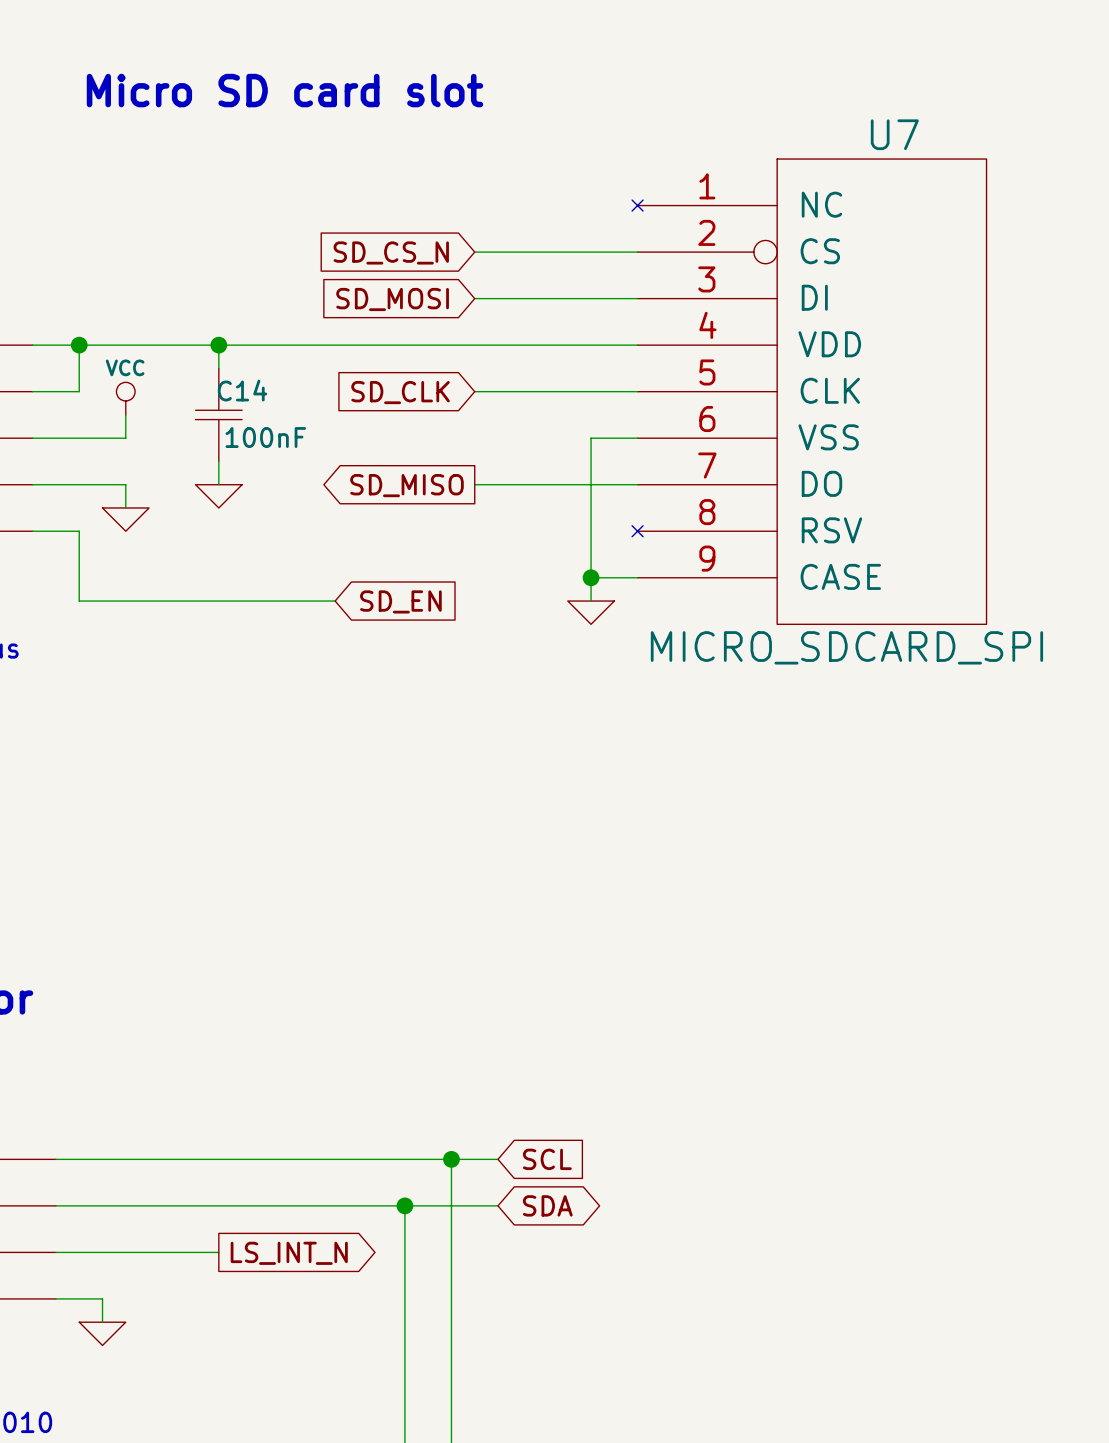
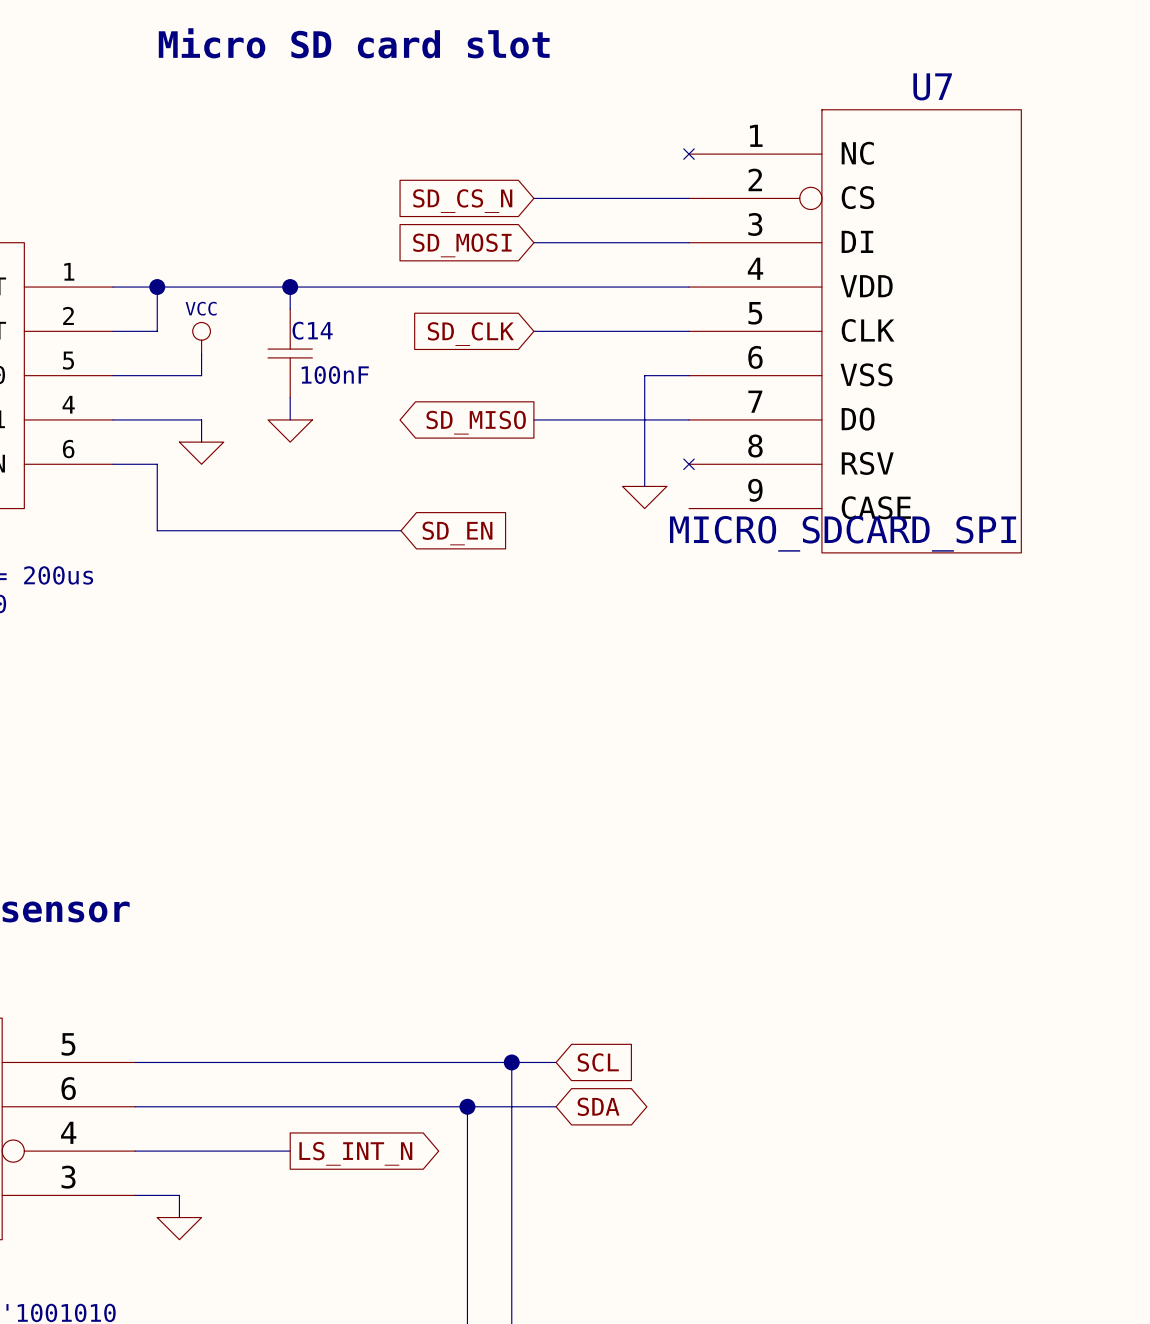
wire: (591, 554) (591, 601) -> none
wire: (591, 577) (637, 577) -> none
junction: (591, 577) -> none
power symbol position: (591, 612) -> (644, 497)
U7 value position: MICRO_SDCARD_SPI (846, 647) -> MICRO_SDCARD_SPI (843, 533)

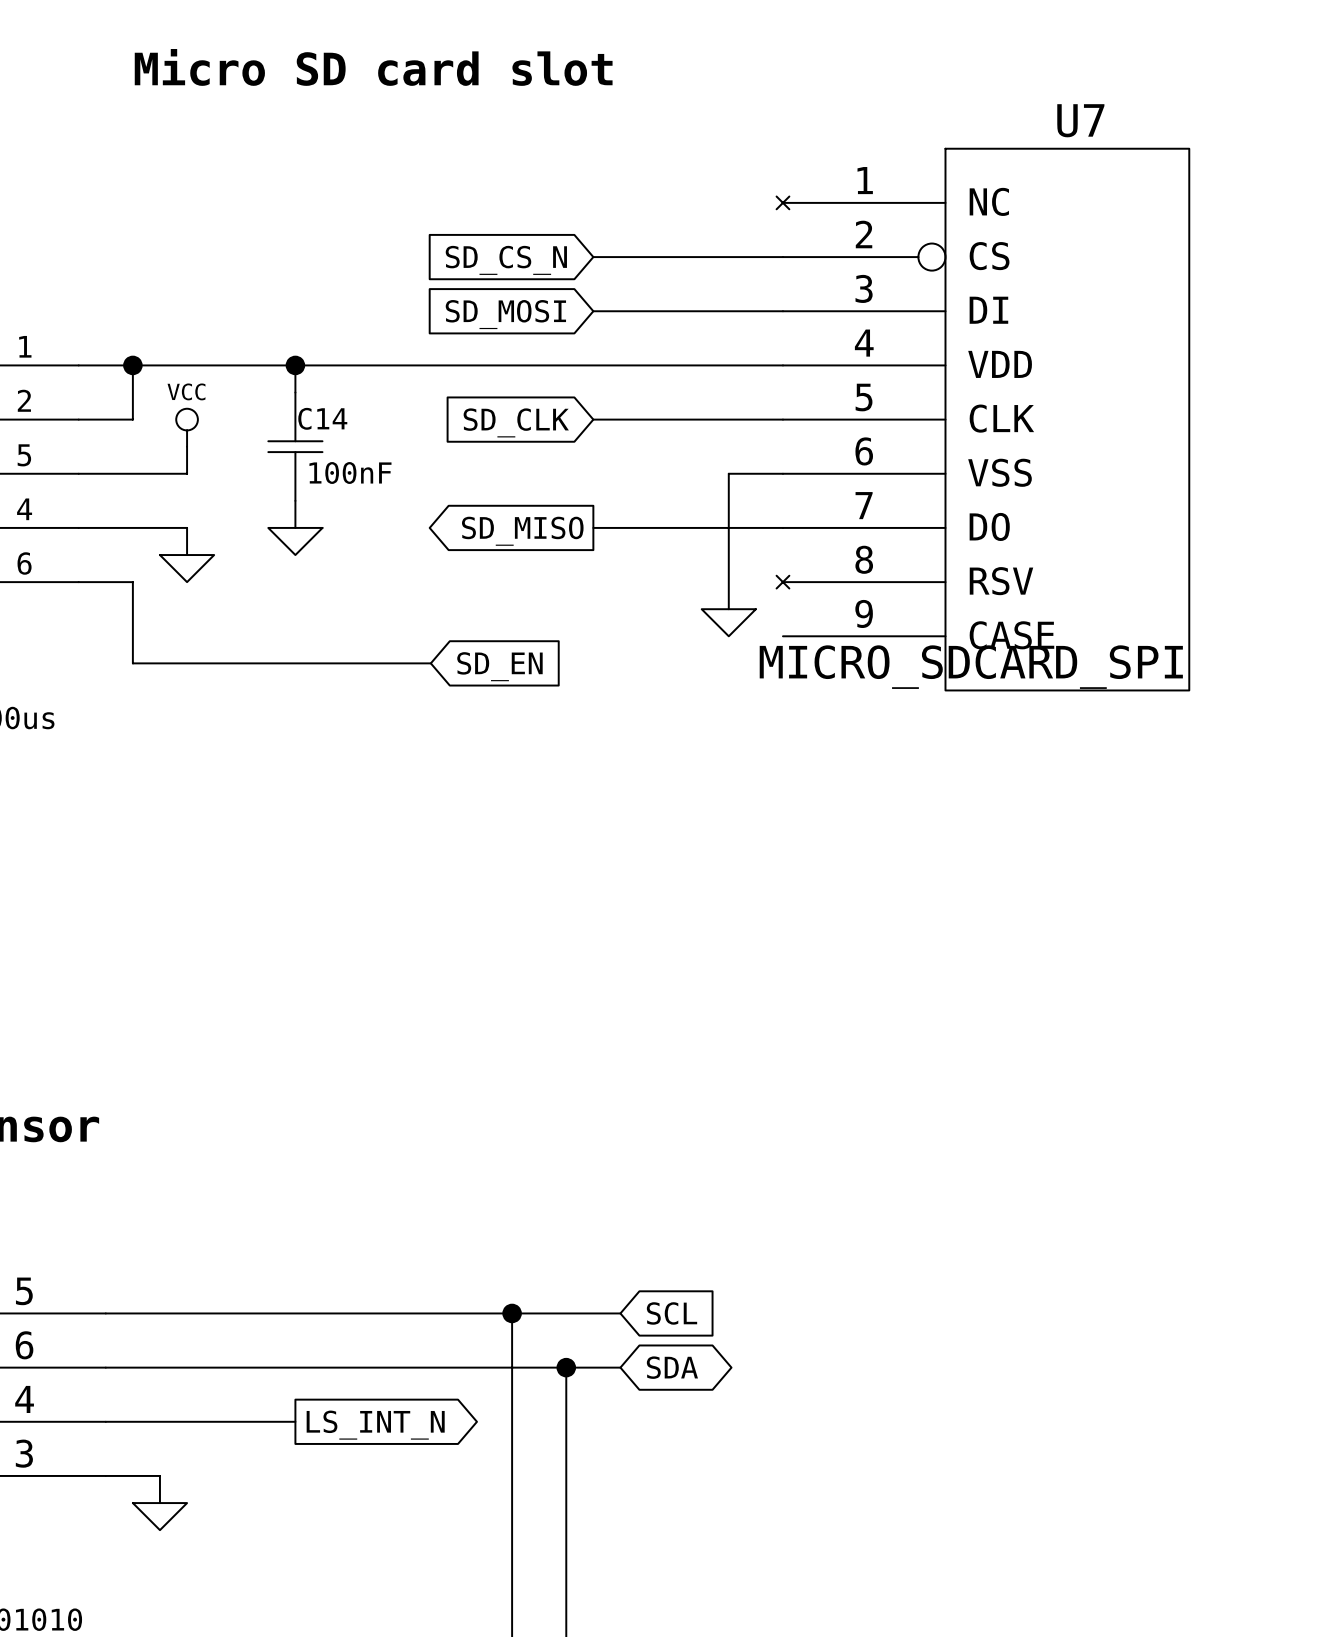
junction: none -> (512, 1313)
wire: (511, 1062) (511, 1106) -> (512, 1313) (512, 1367)
junction: (511, 1062) -> none
junction: (467, 1106) -> none
junction: none -> (566, 1367)

